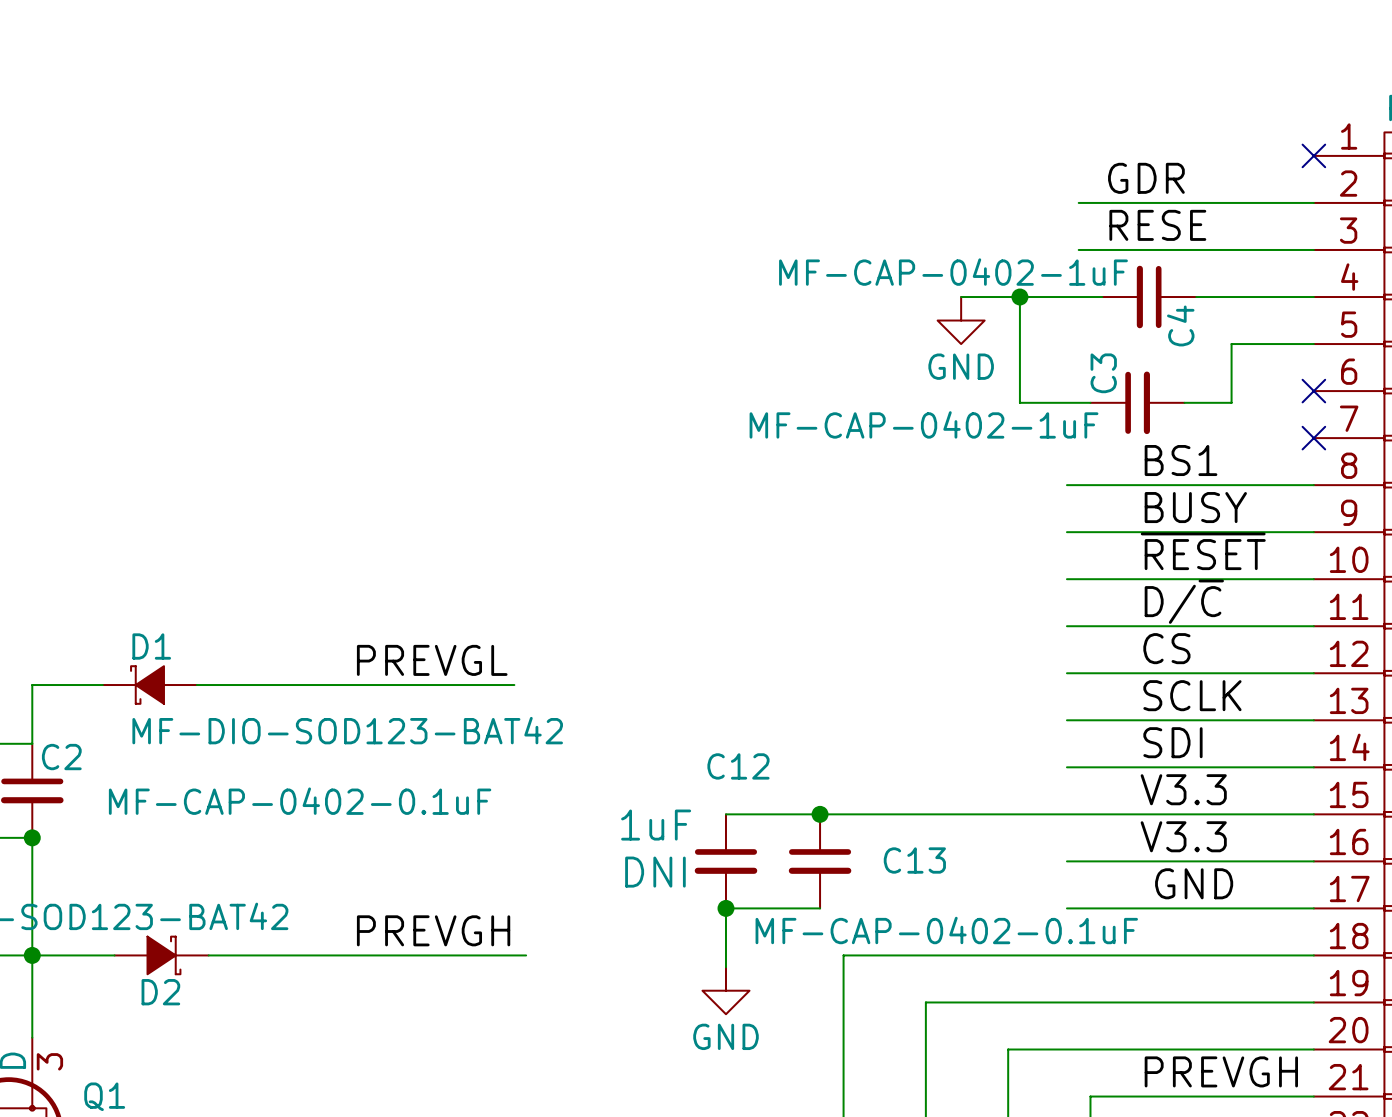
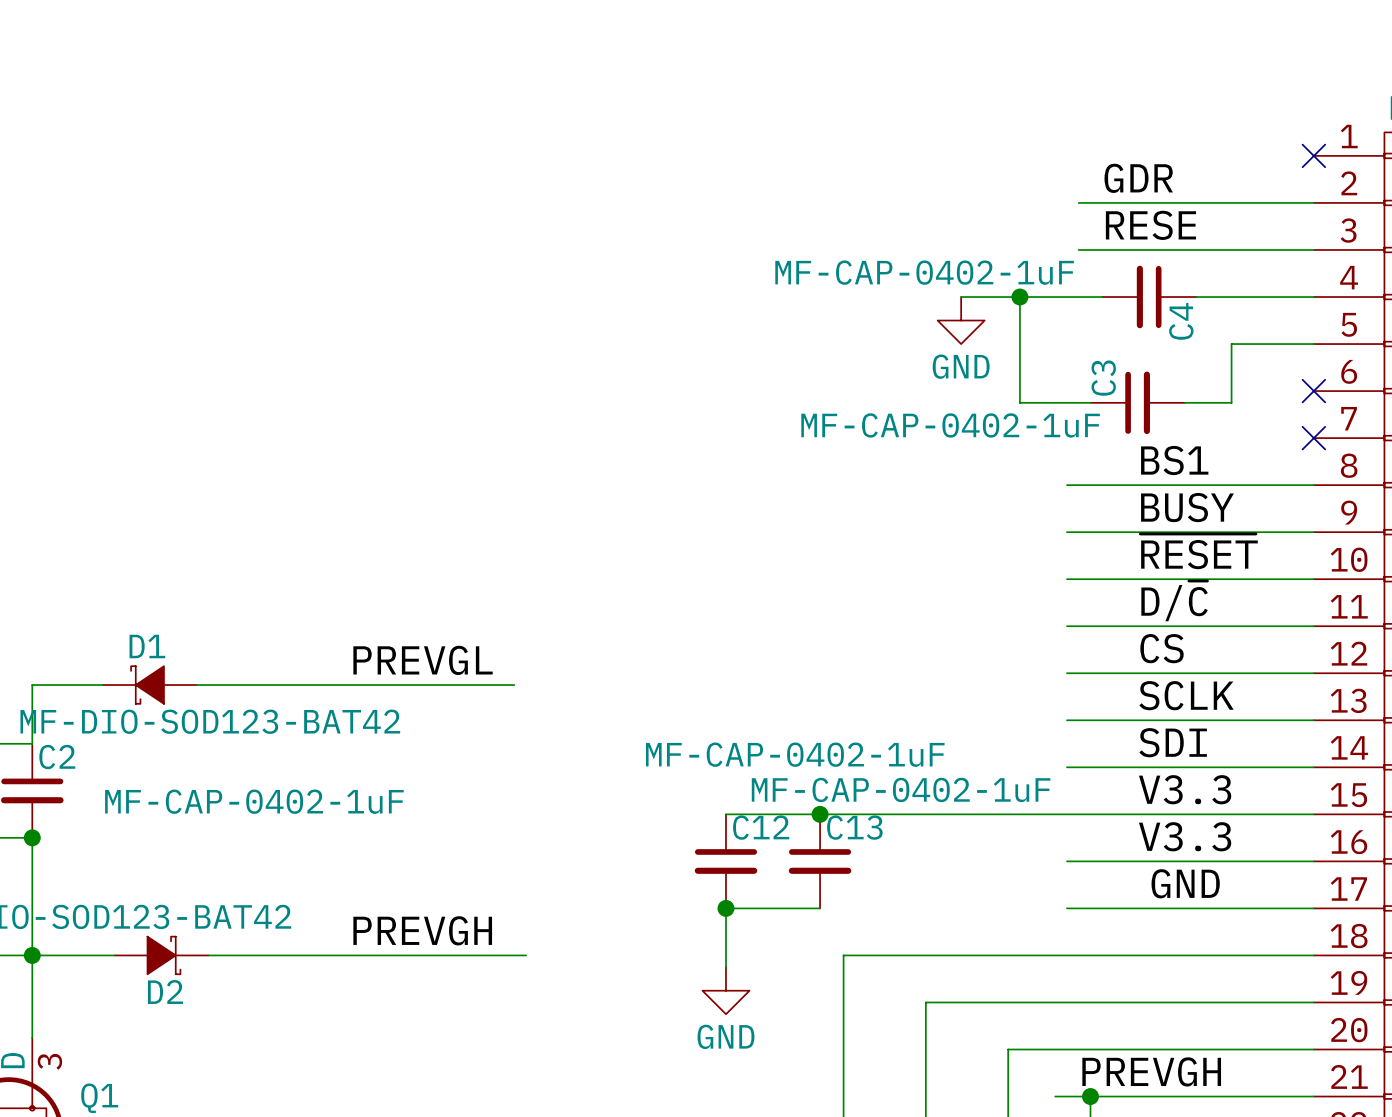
D1 value position: MF-DIO-SOD123-BAT42 (347, 730) -> MF-DIO-SOD123-BAT42 (210, 721)
C12 value: none -> MF-CAP-0402-1uF (795, 754)
C12 name position: C12 (738, 766) -> C12 (761, 827)
C2 value: MF-CAP-0402-0.1uF (300, 801) -> MF-CAP-0402-1uF (254, 801)
C12 text: 1uF (656, 825) -> none
C13 name position: C13 (914, 860) -> C13 (854, 827)
C12 text: DNI (655, 872) -> none
C13 value: MF-CAP-0402-0.1uF (946, 930) -> MF-CAP-0402-1uF (901, 789)
label position: PREVGH (1221, 1071) -> PREVGH (1151, 1071)
wire: none -> (1055, 1096) (1090, 1096)
junction: none -> (1090, 1096)

